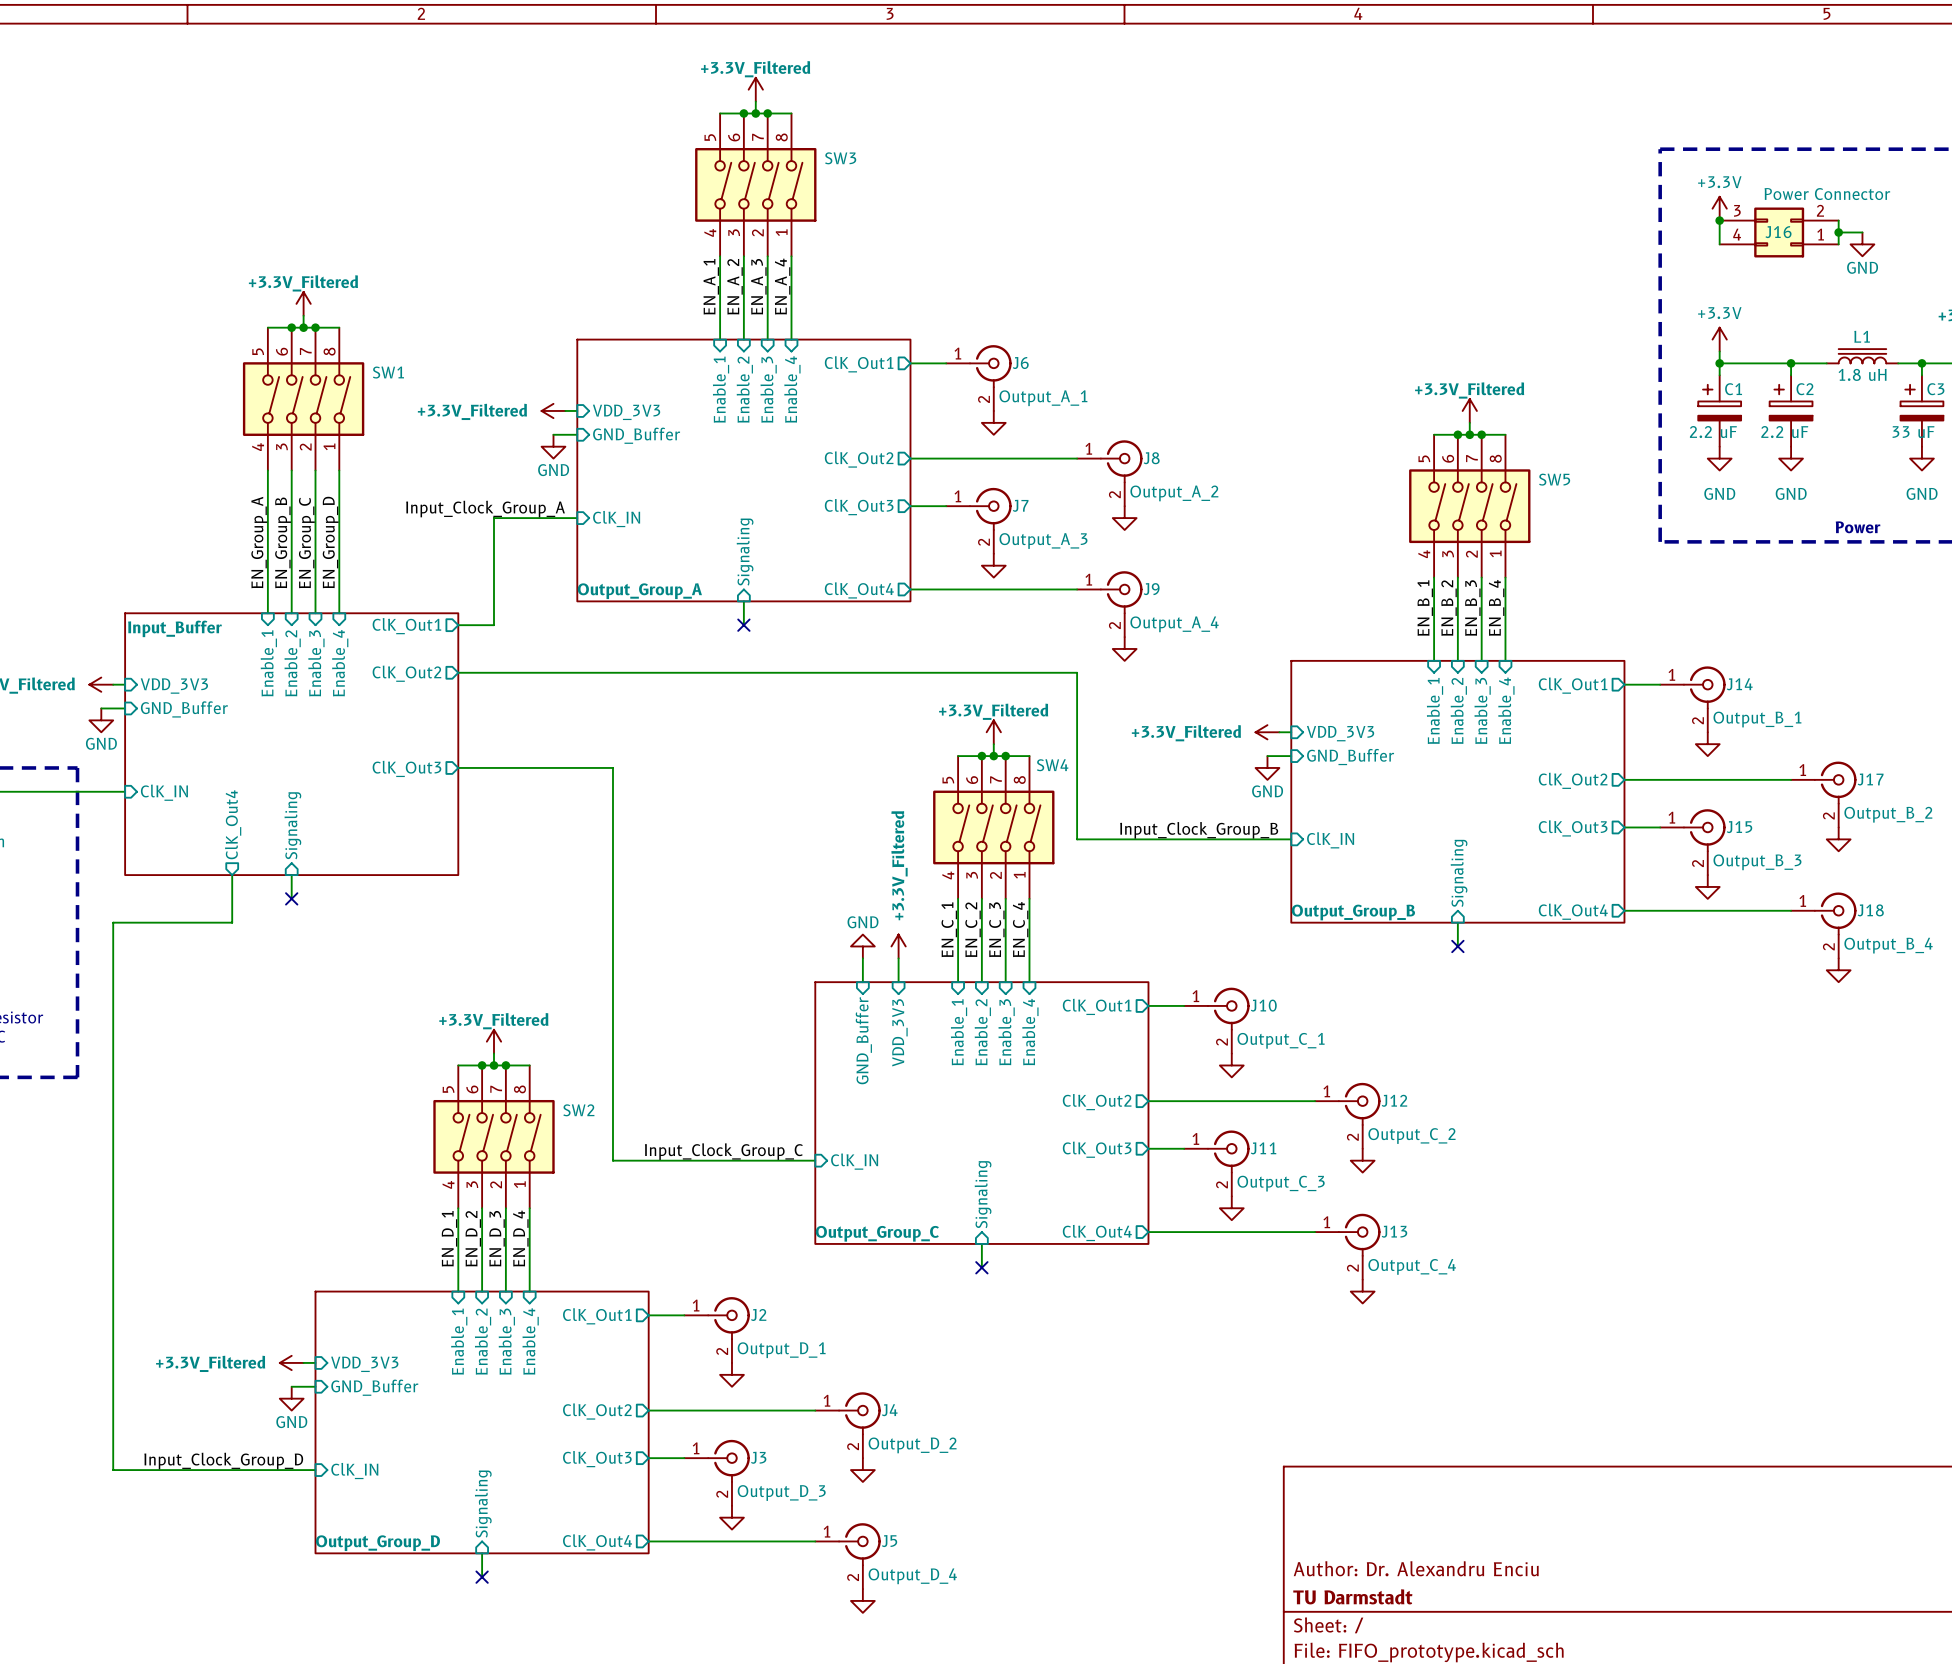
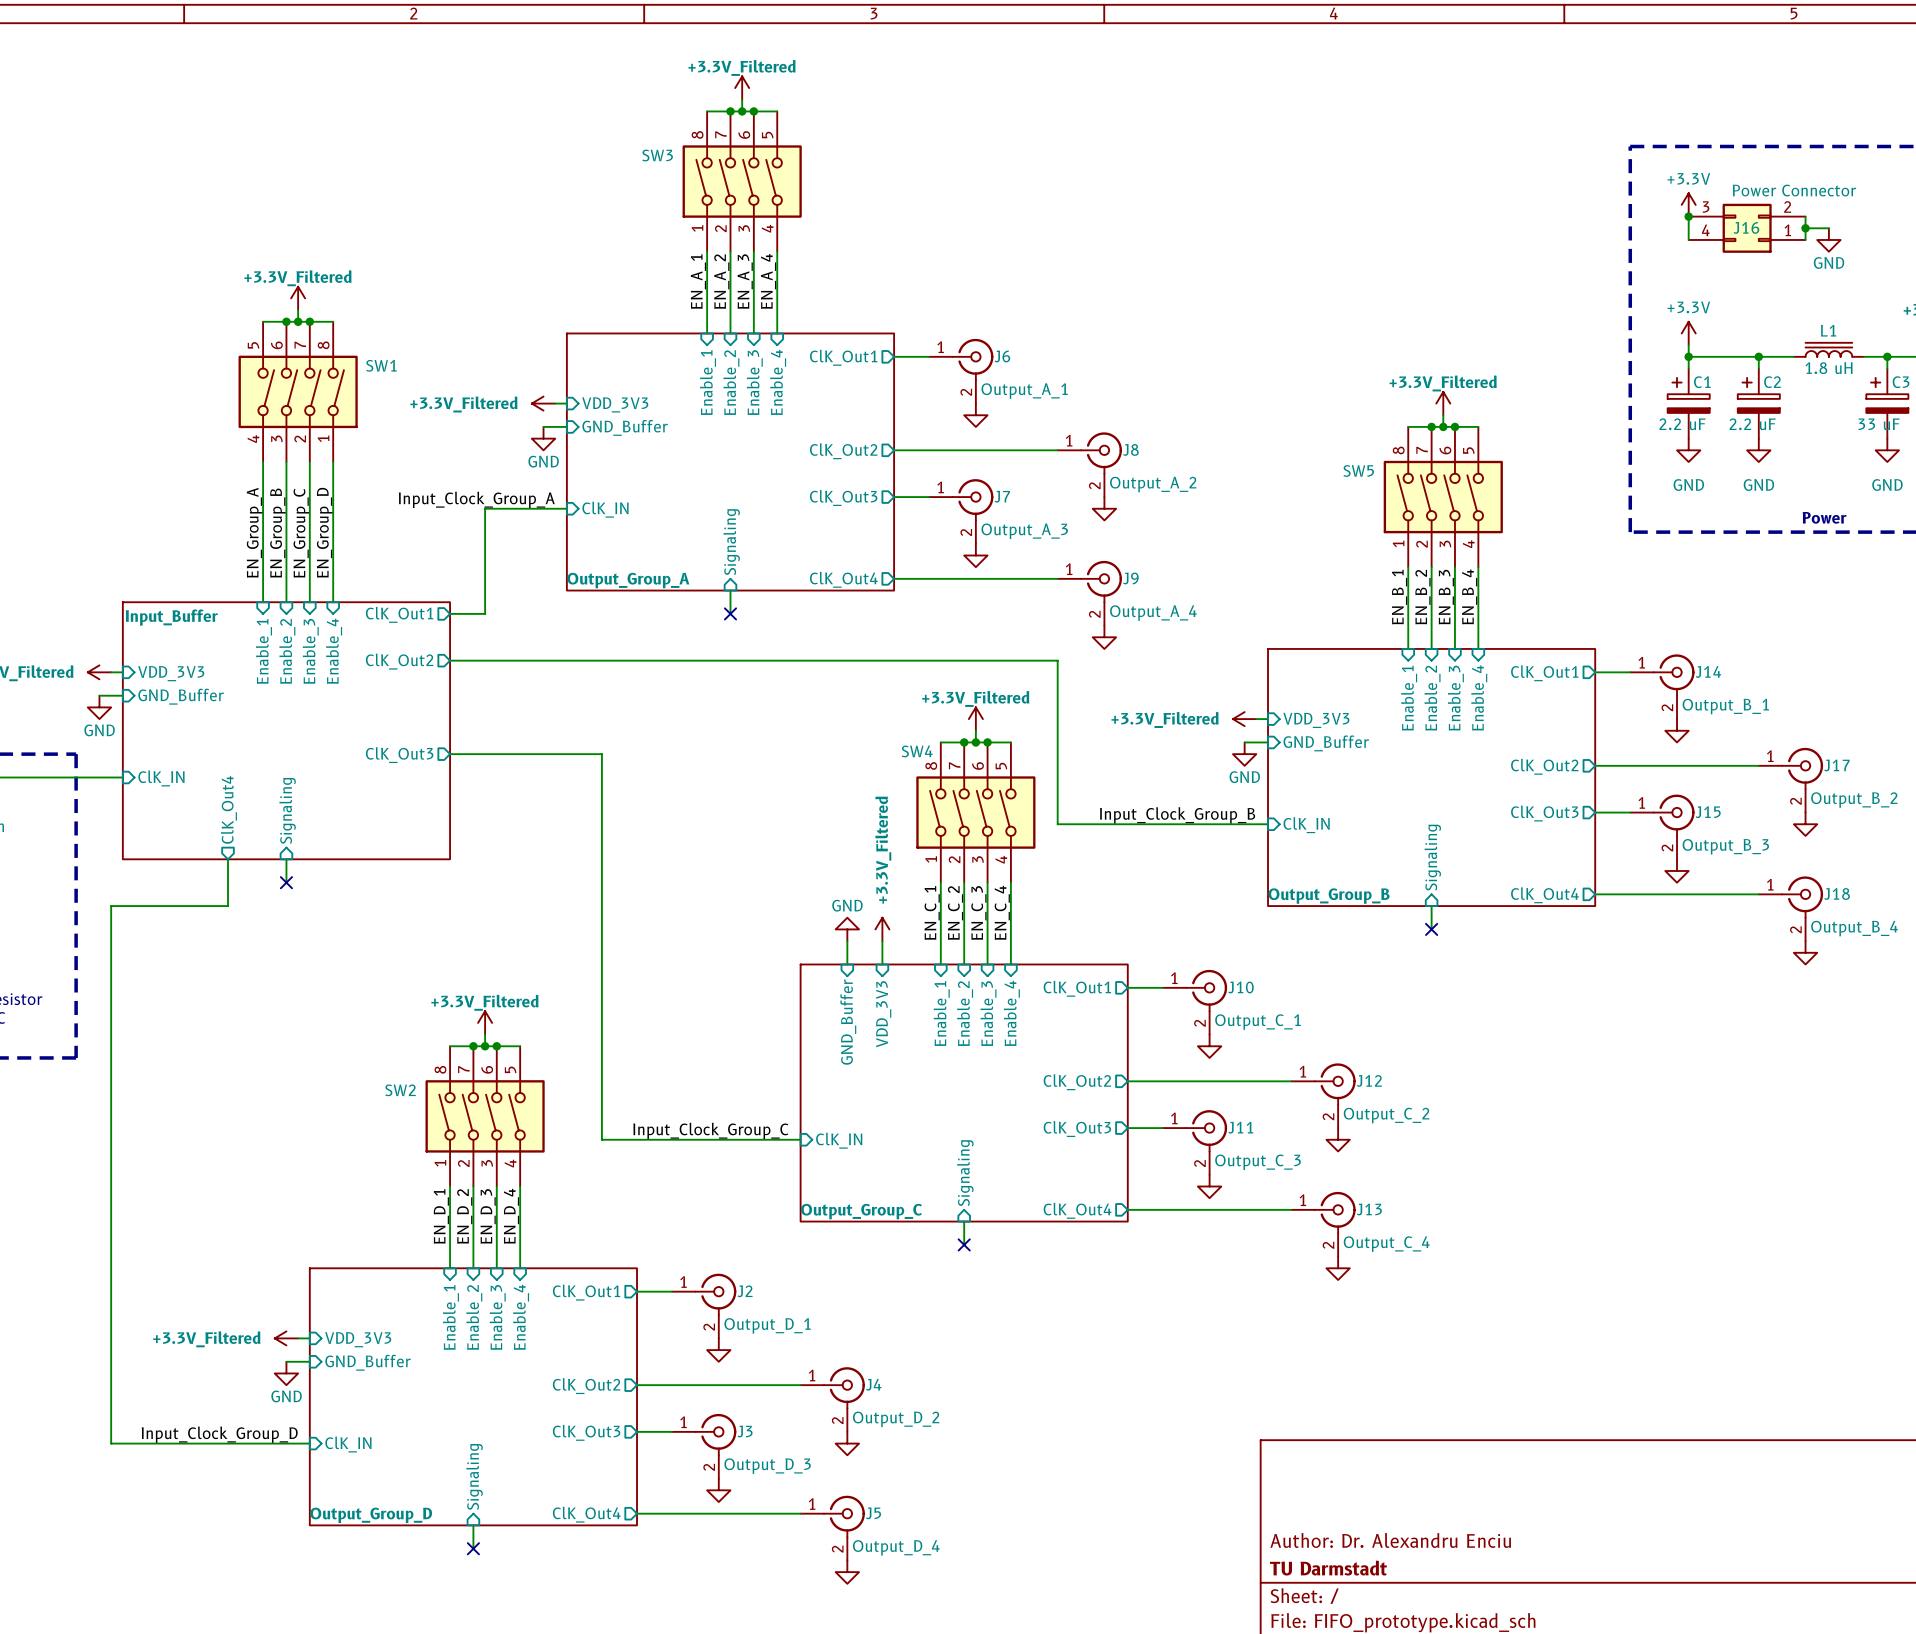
SW3 flip: as is (755, 184) -> left-right (742, 181)
SW5 flip: as is (1469, 506) -> left-right (1443, 497)
SW4 flip: as is (993, 827) -> left-right (975, 812)
SW2 flip: as is (493, 1136) -> left-right (485, 1116)

